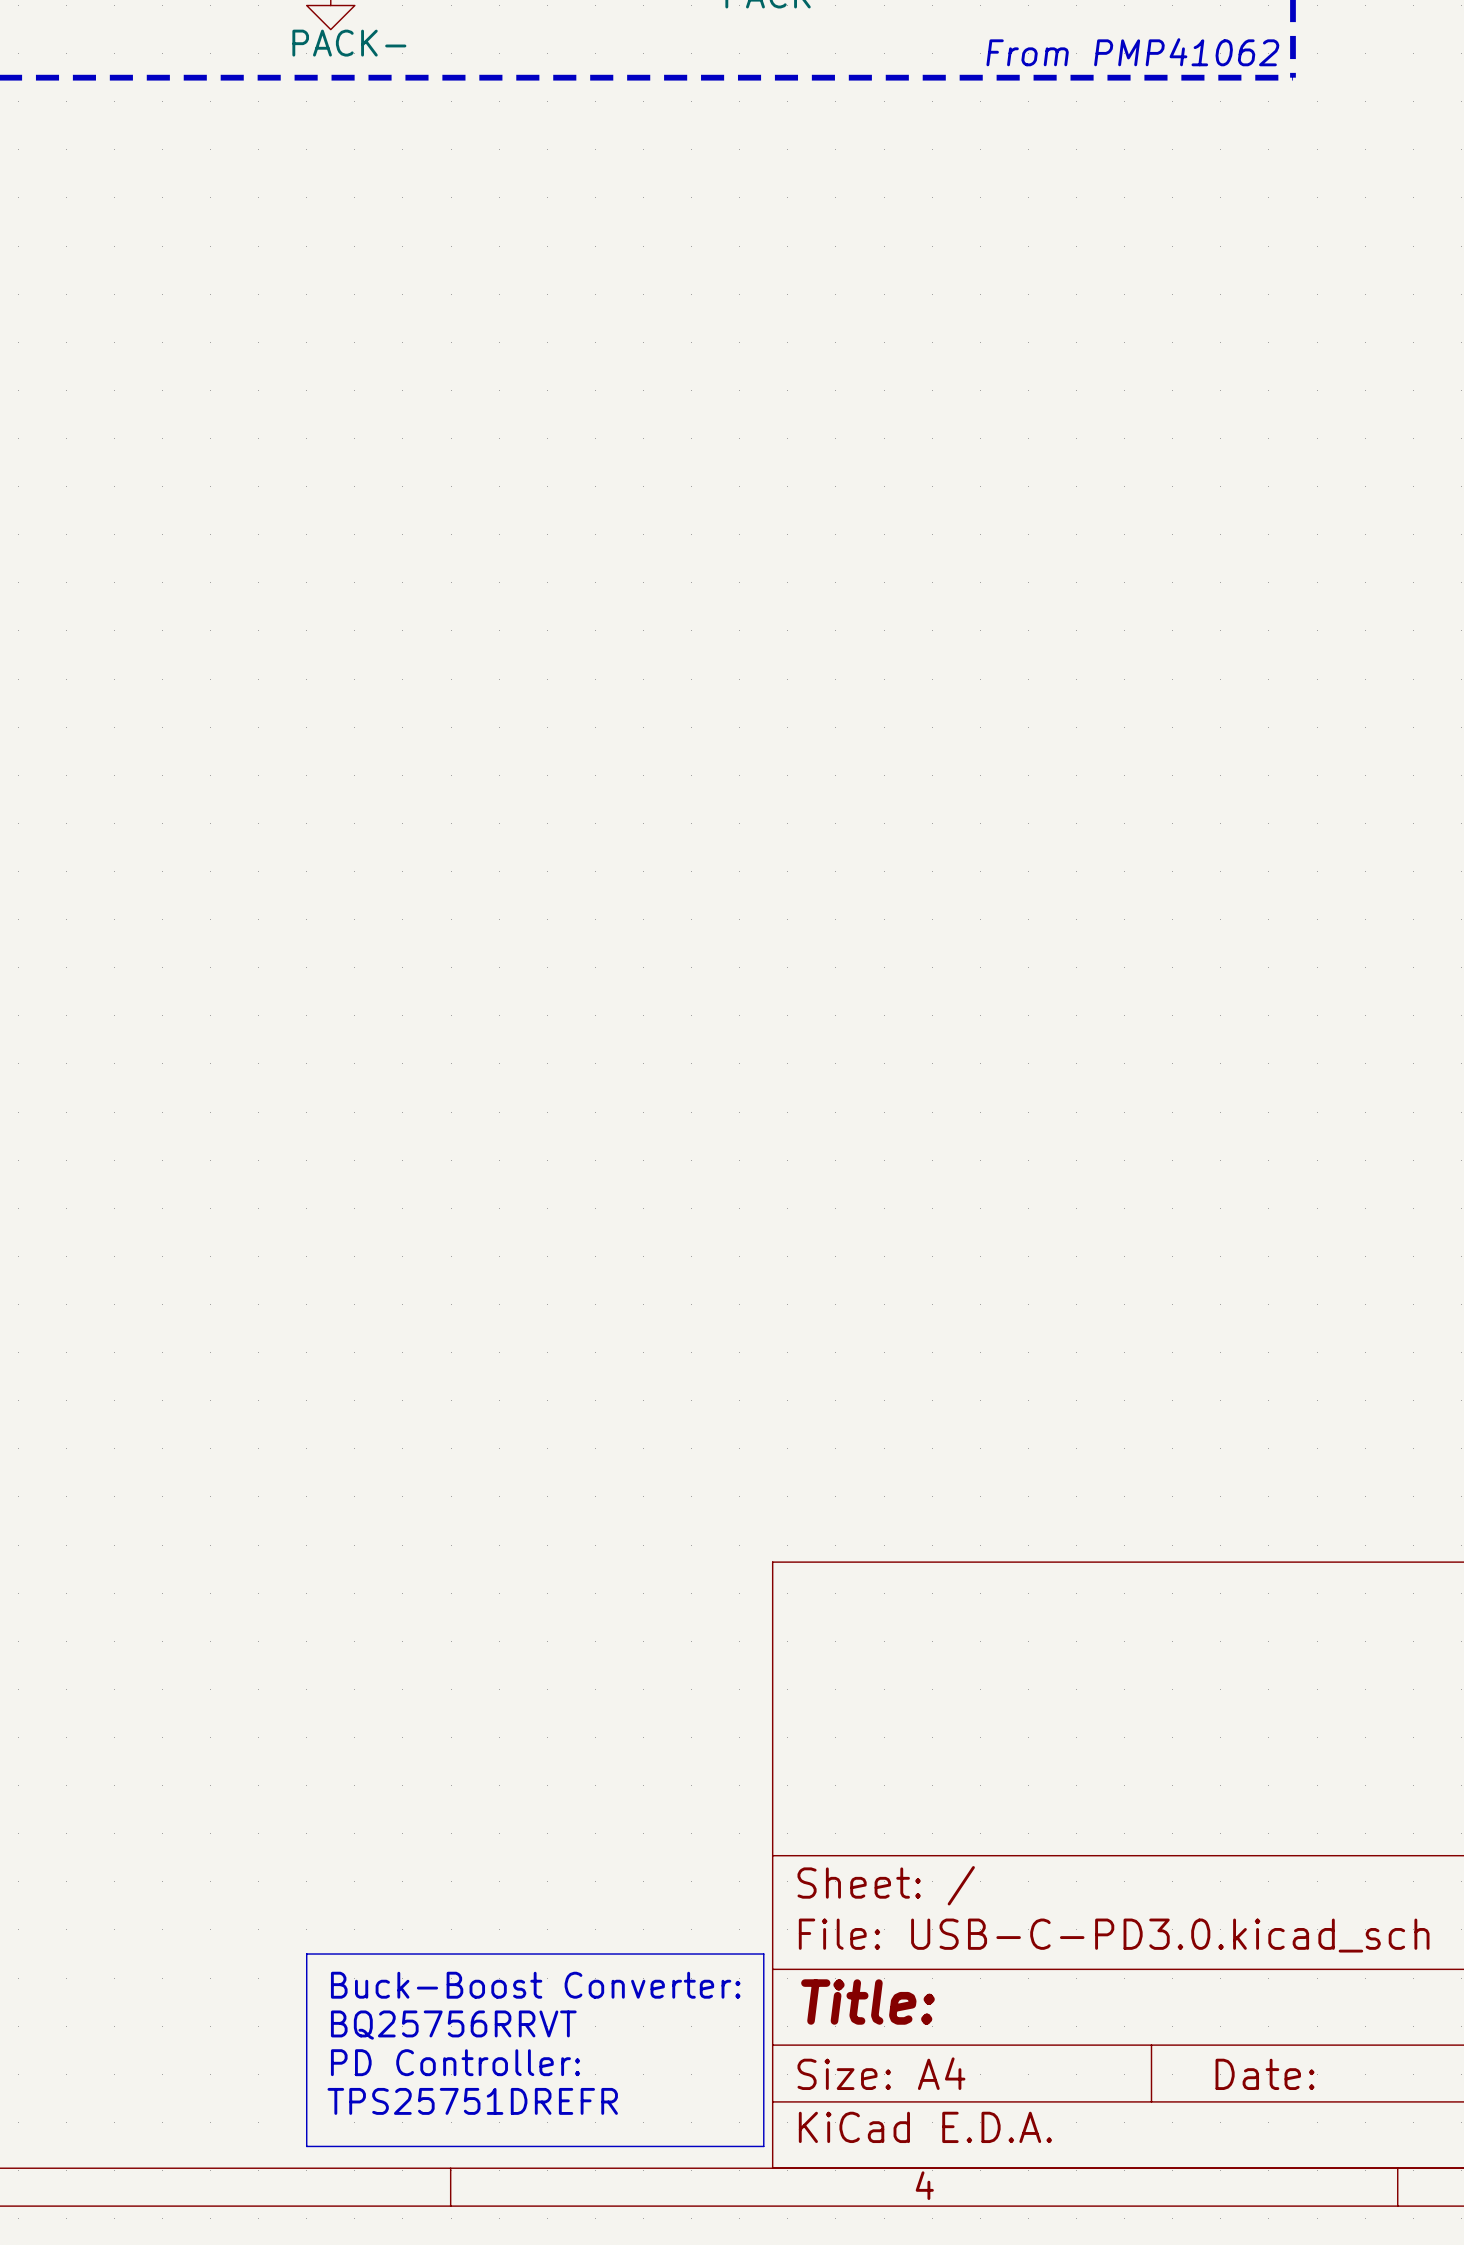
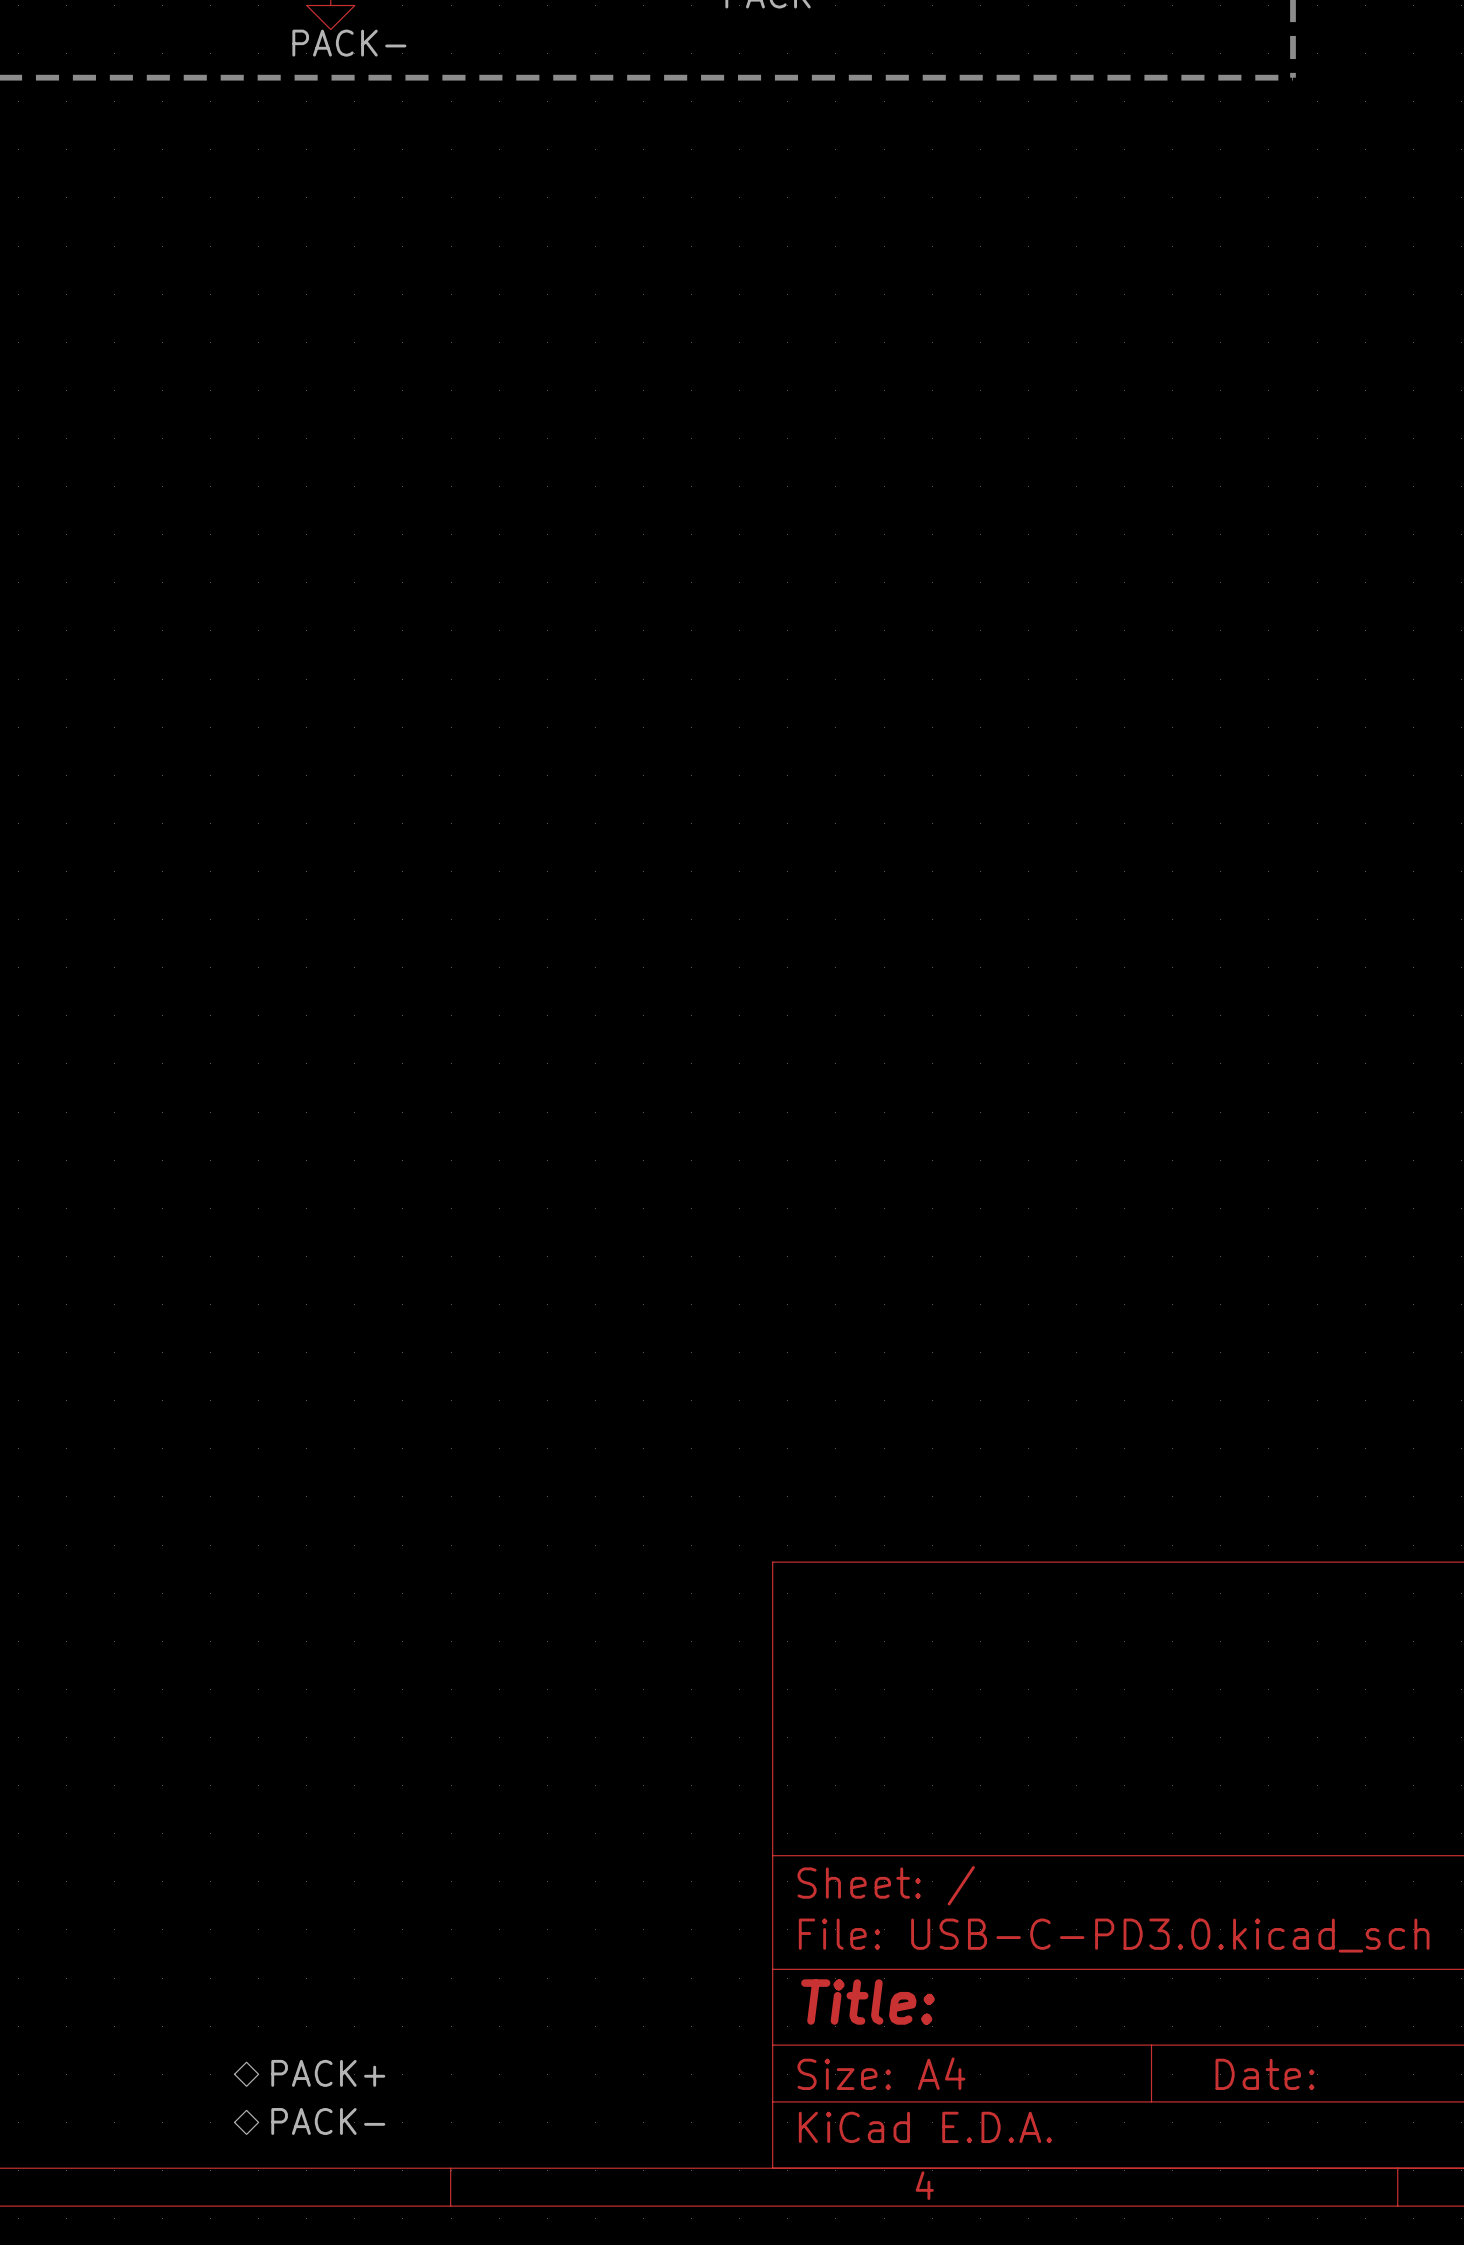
text: From PMP41062 (1132, 52) -> none
line: (306, 1954) (763, 1954) (763, 2146) (306, 2146) (306, 1954) -> none
text: Buck-Boost Converter: (535, 1985) -> none
text: BQ25756RRVT (453, 2025) -> none
text: PD Controller: (455, 2062) -> none
hierarchical label: none -> PACK+ (328, 2073)
text: TPS25751DREFR (472, 2101) -> none
hierarchical label: none -> PACK- (328, 2121)

